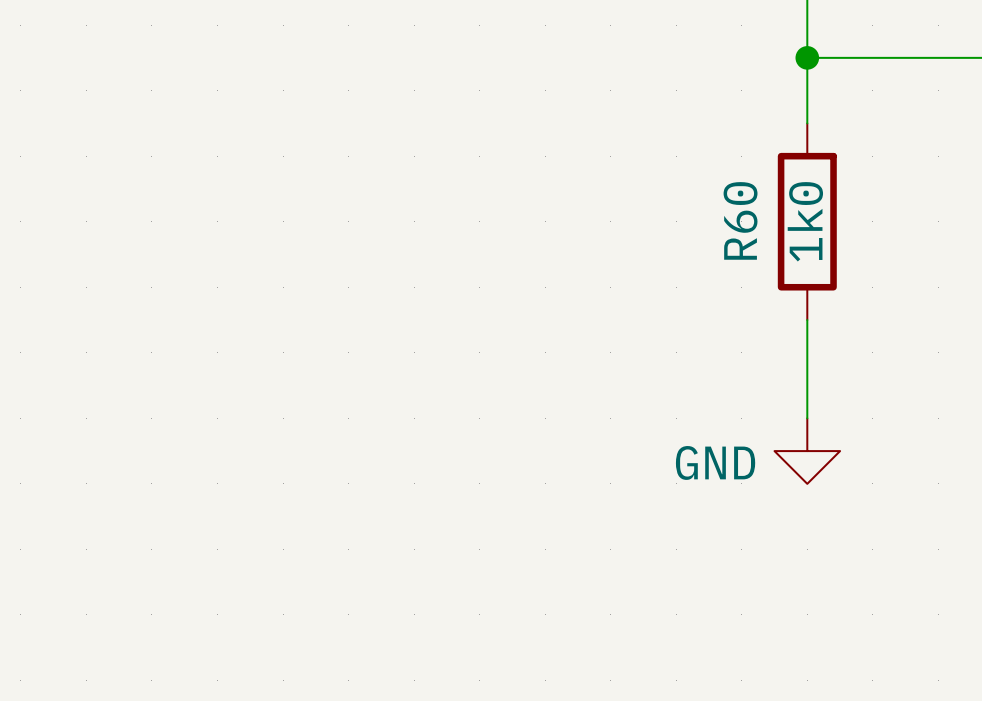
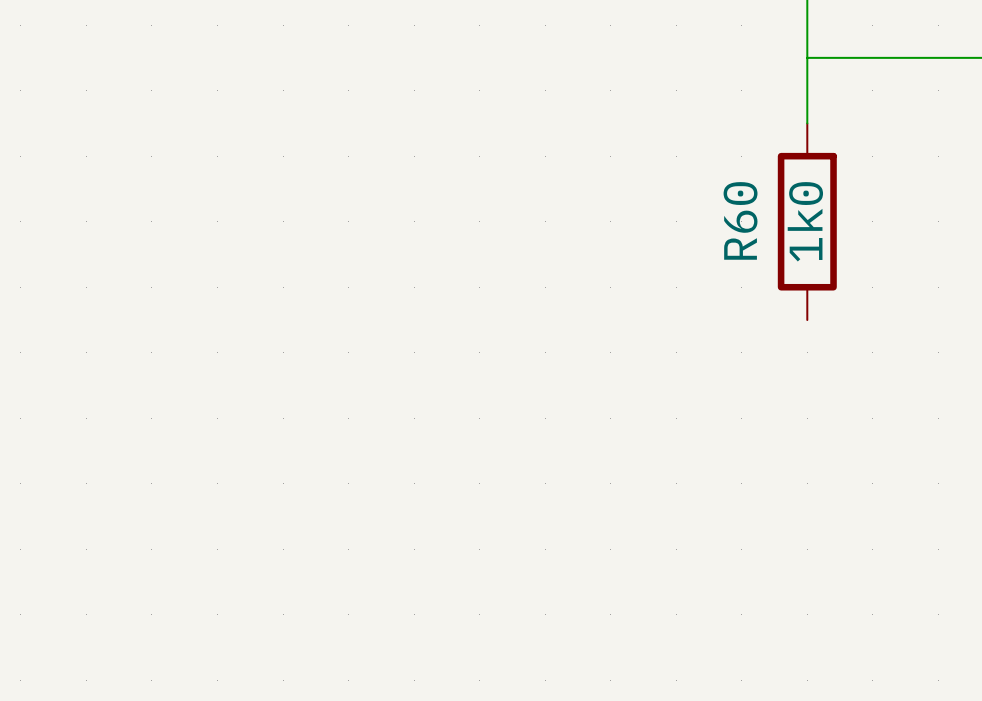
junction: (807, 57) -> none
wire: (807, 320) (807, 418) -> none
power symbol: GND (807, 451) -> none

